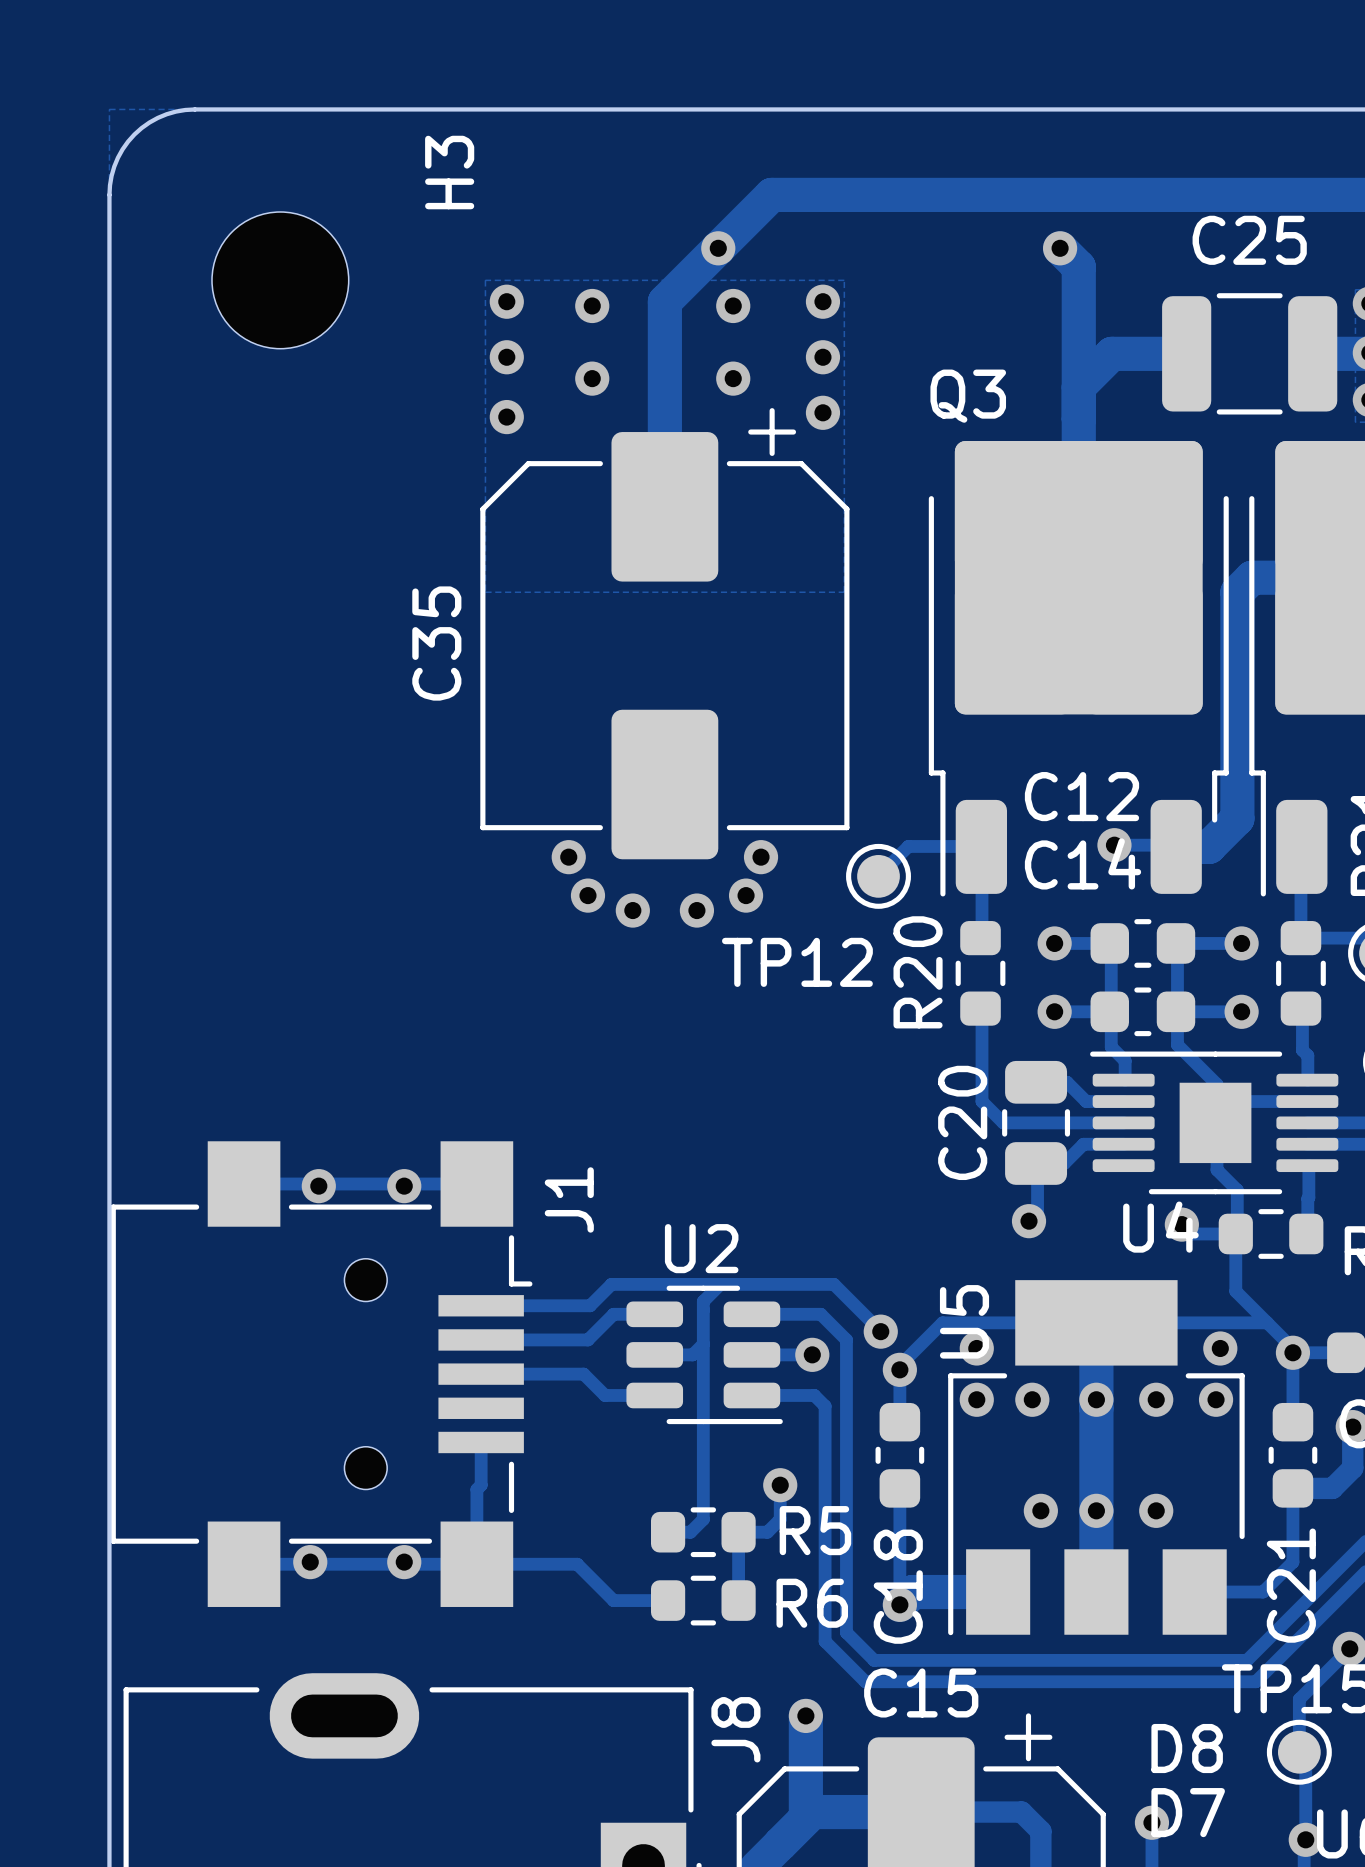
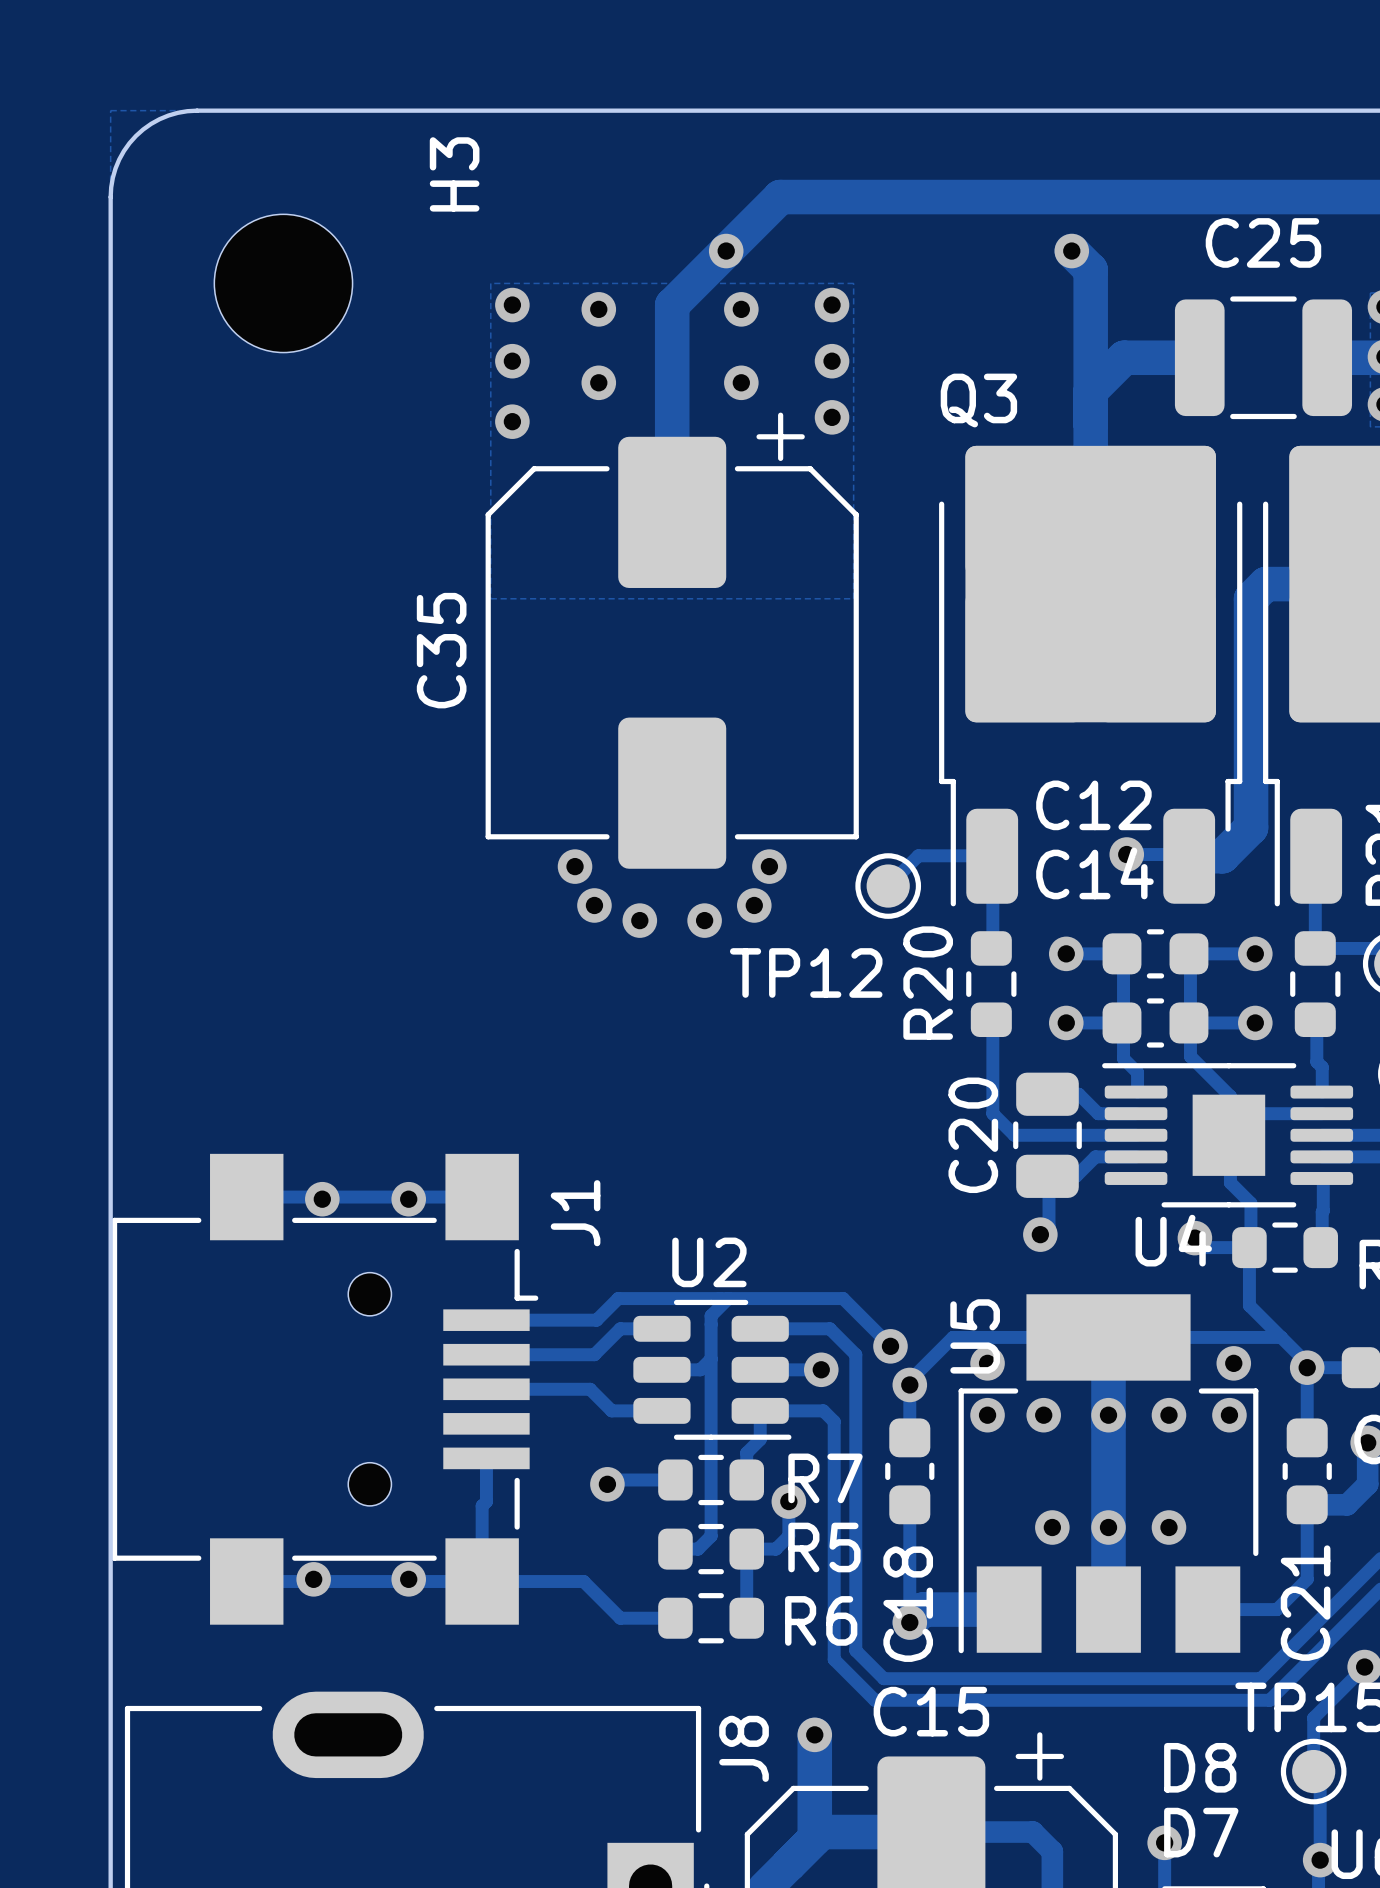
track: none -> (760, 1410) (760, 1439) (746, 1452) (746, 1479)
track: none -> (675, 1479) (611, 1479) (607, 1484)
R7: none -> (711, 1479)
via: none -> (607, 1484)

